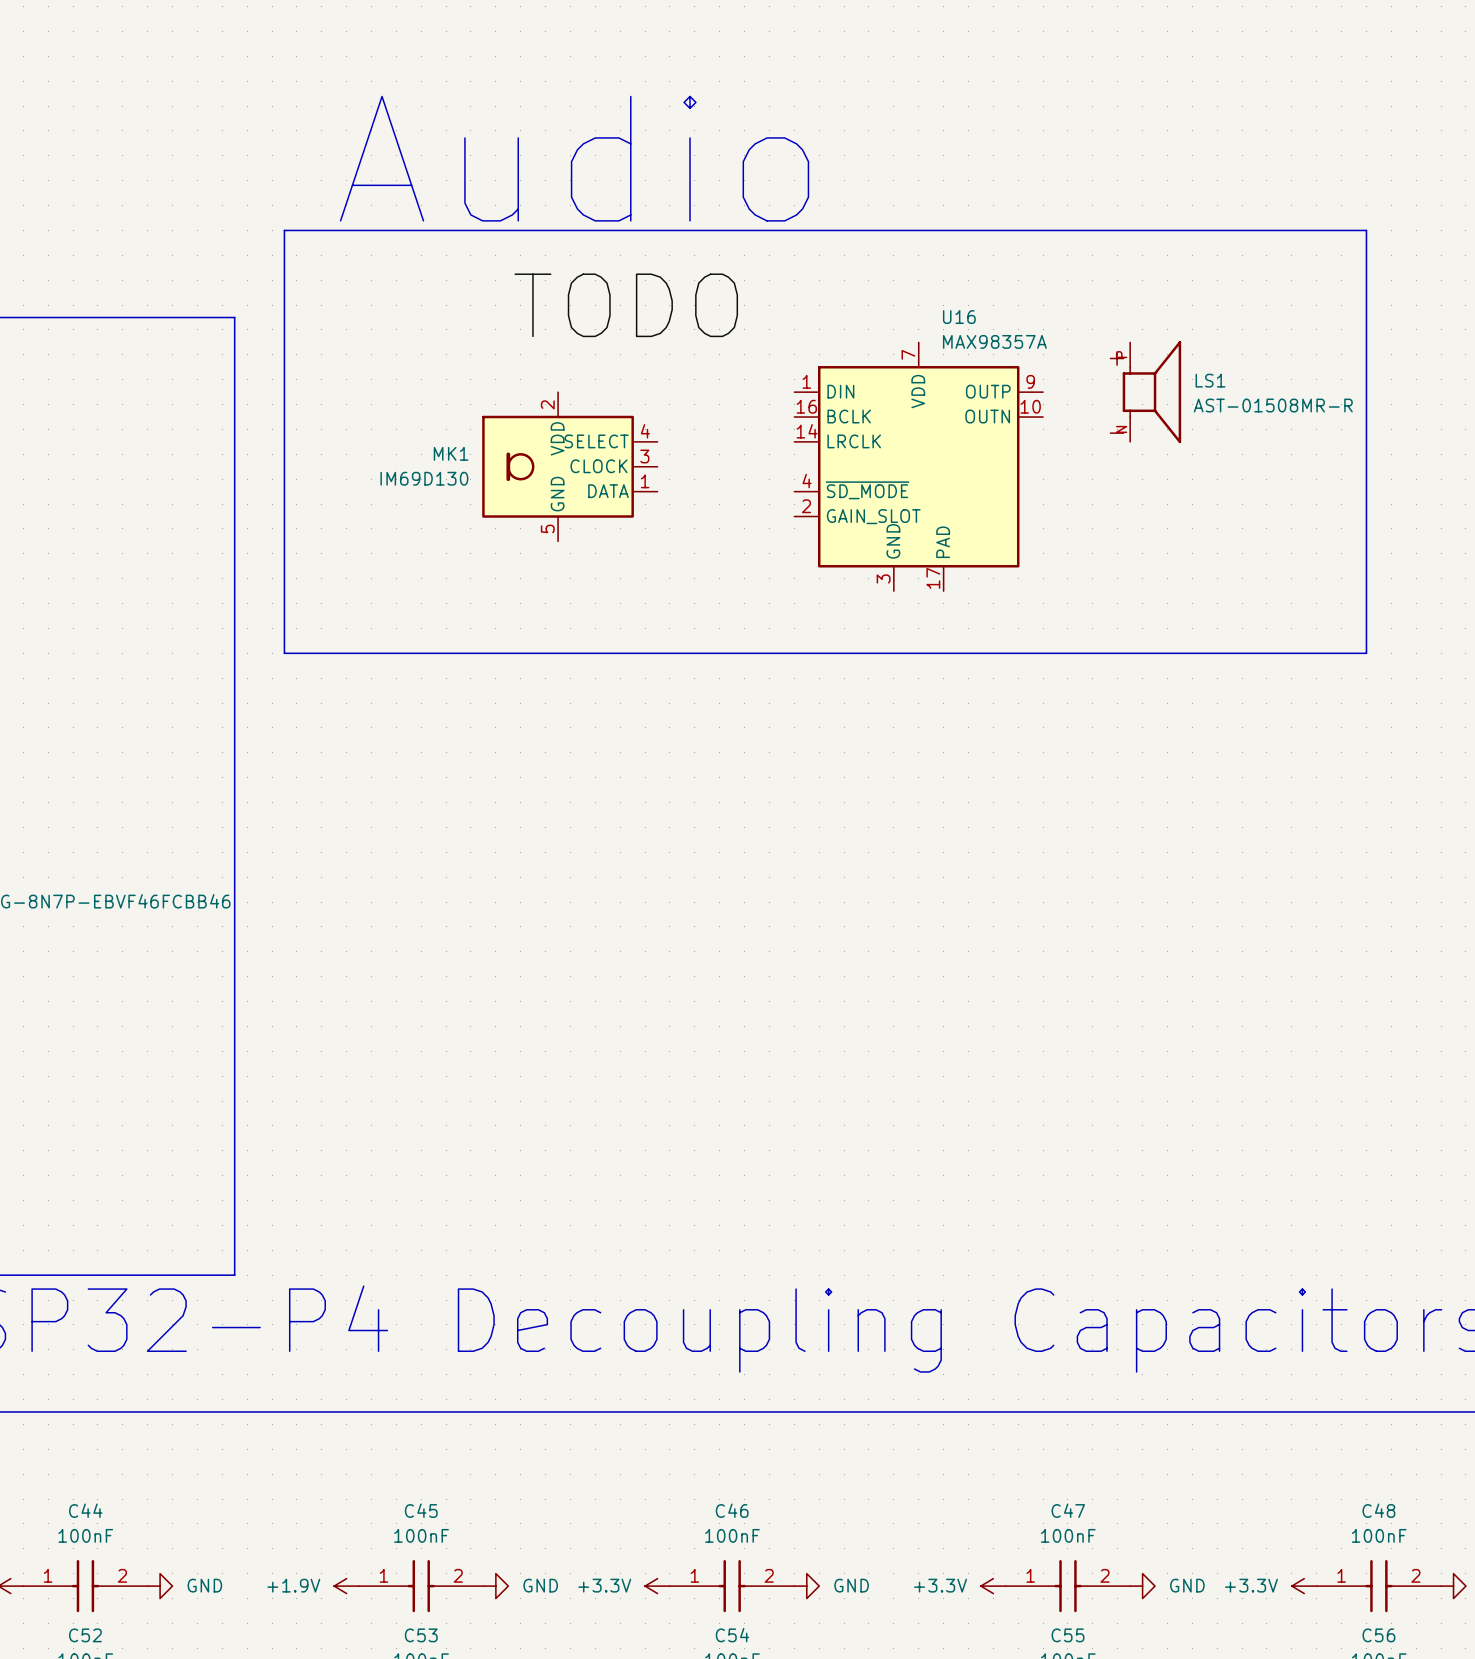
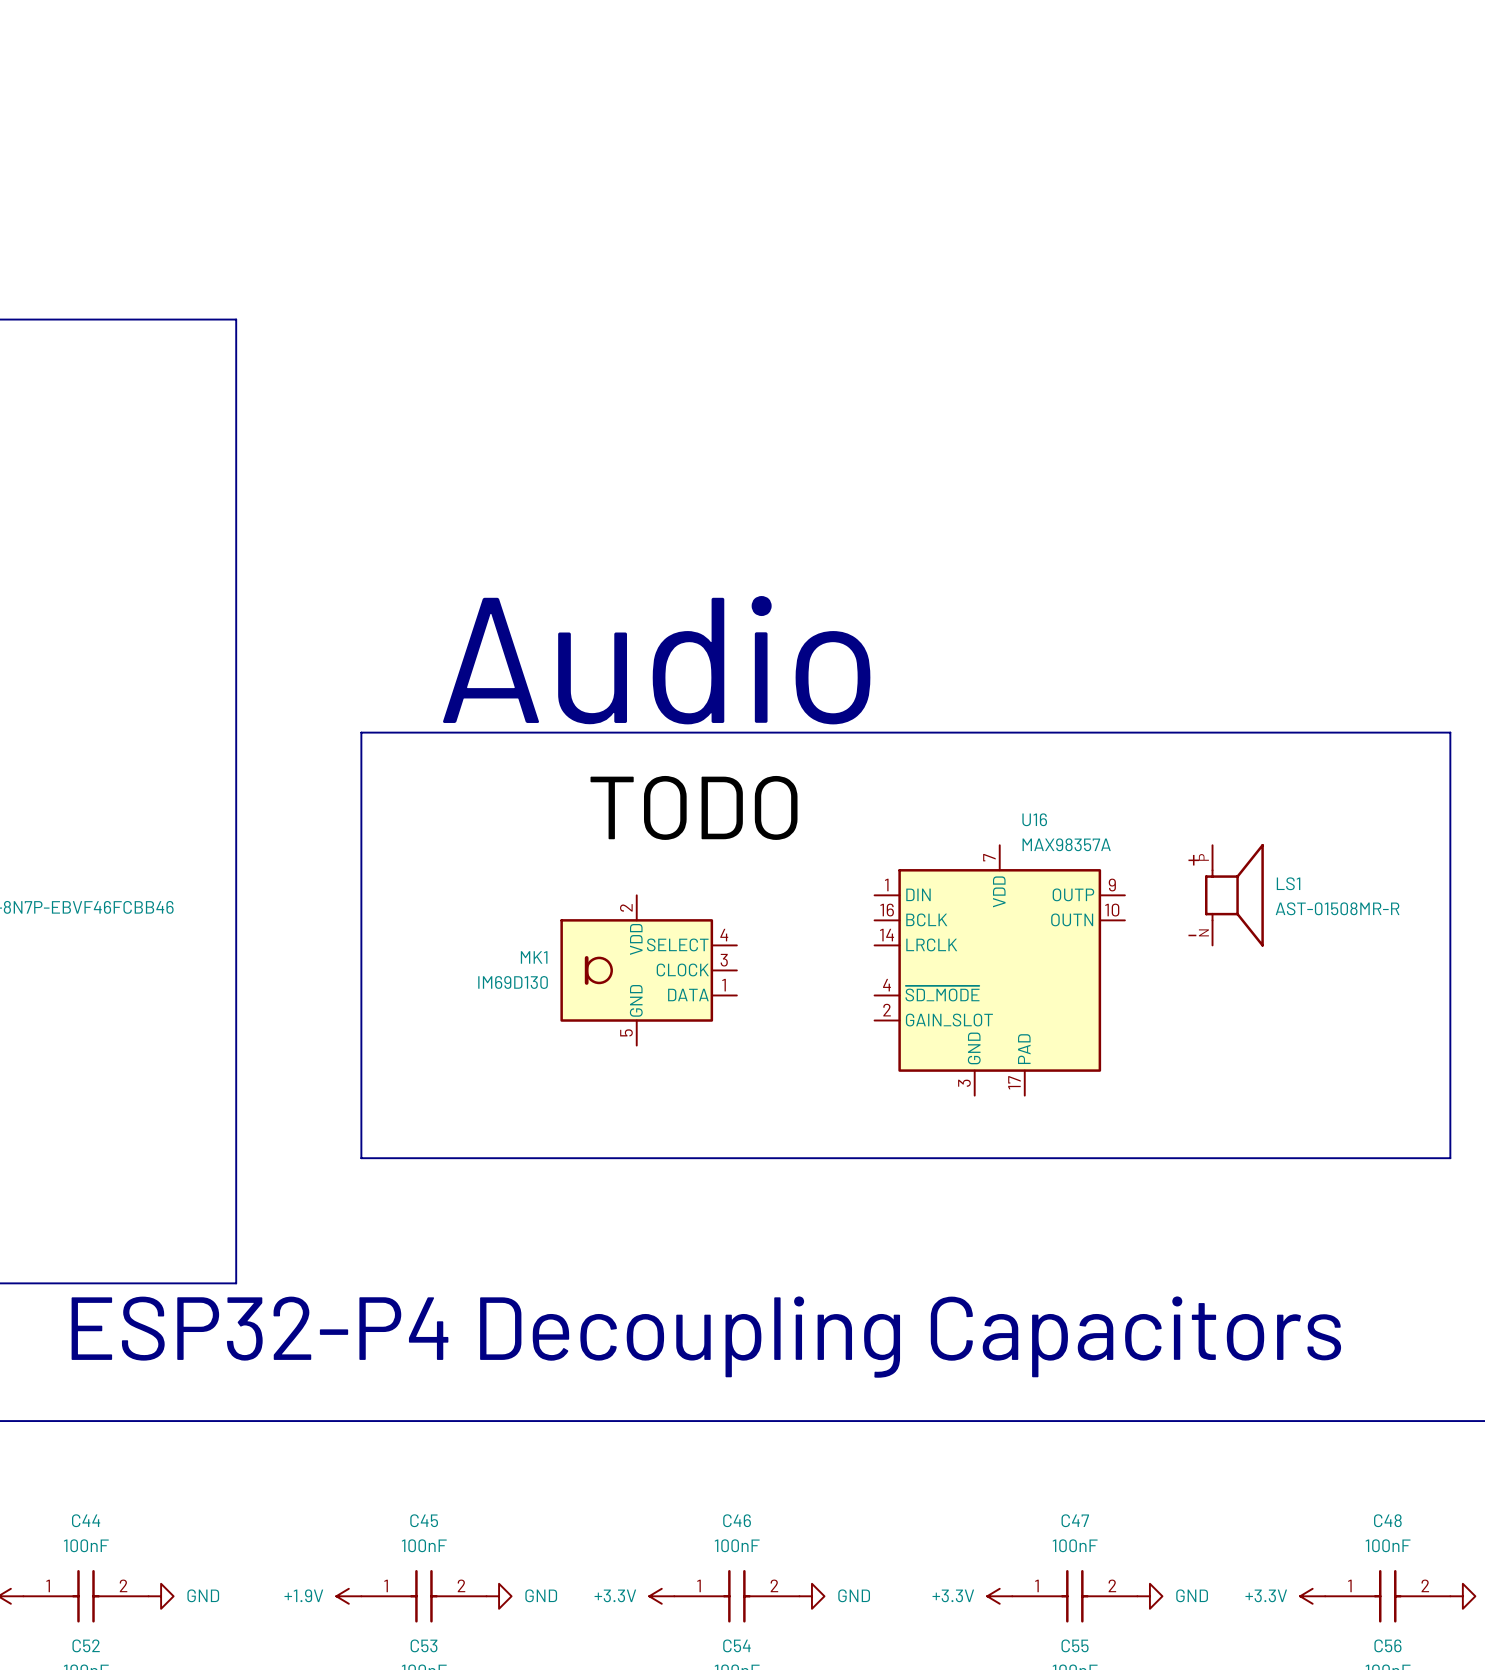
text: Audio (574, 158) -> none
line: (284, 230) (1366, 230) (1366, 653) (284, 653) (284, 230) -> none
label: TODO (626, 305) -> none
LS1 position: (1151, 392) -> (1234, 895)
MK1 position: (569, 466) -> (648, 970)
U16 position: (918, 466) -> (999, 970)
text: none -> Audio (656, 660)
line: none -> (361, 732) (1450, 732) (1450, 1158) (361, 1158) (361, 732)
label: none -> TODO (694, 807)

